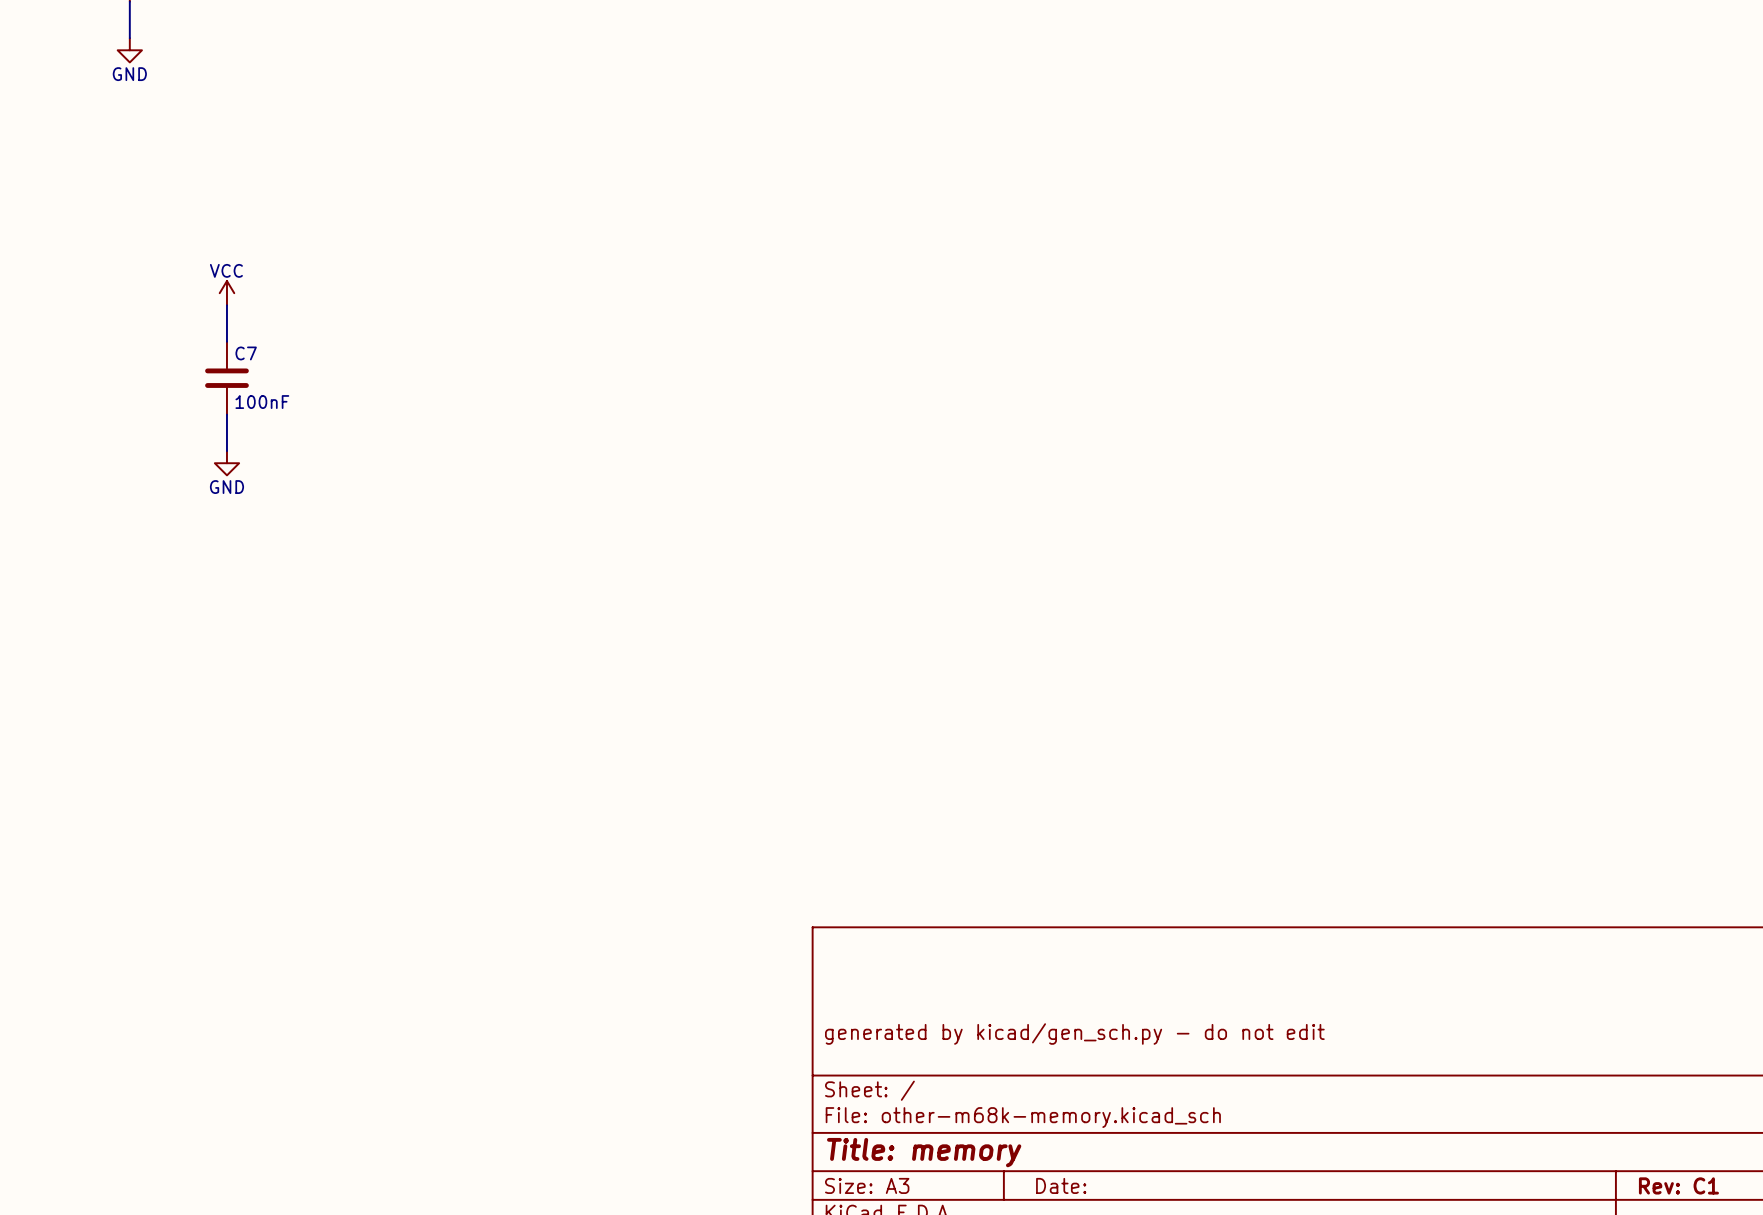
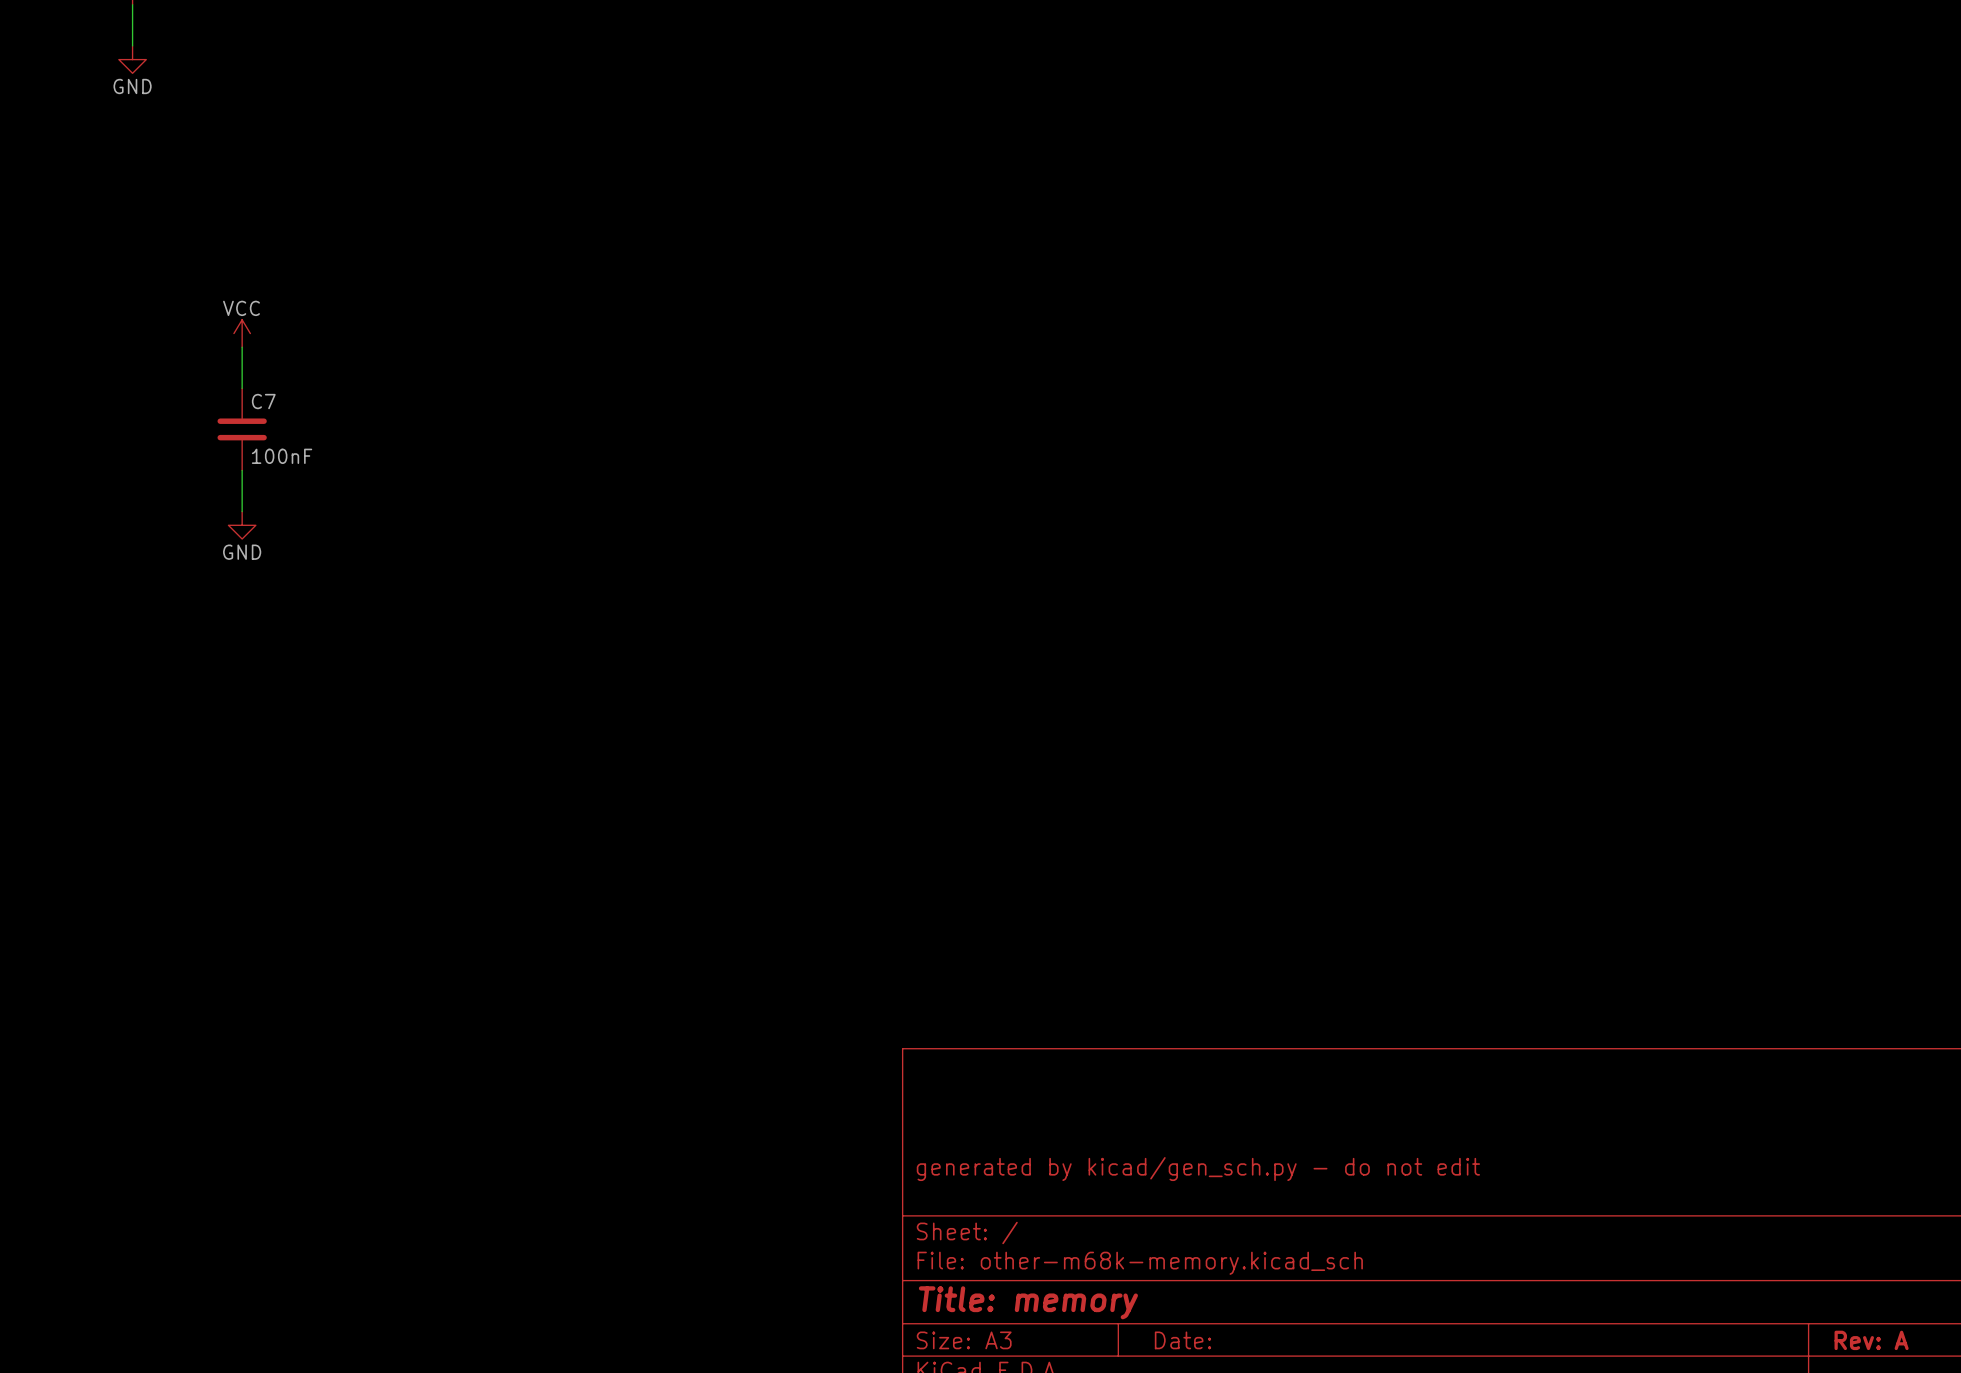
title block: Rev: C1 (1678, 1185) -> Rev: A (1871, 1340)

